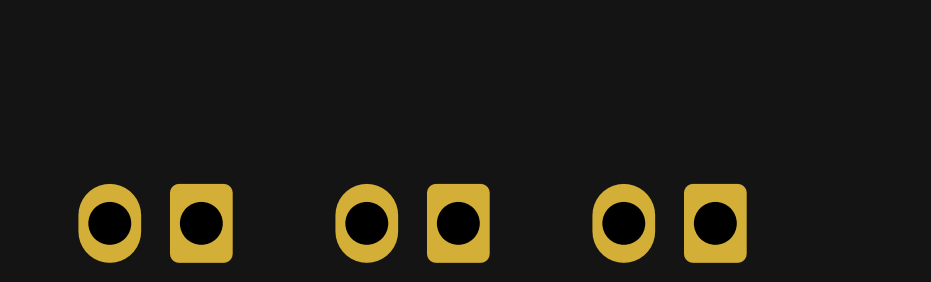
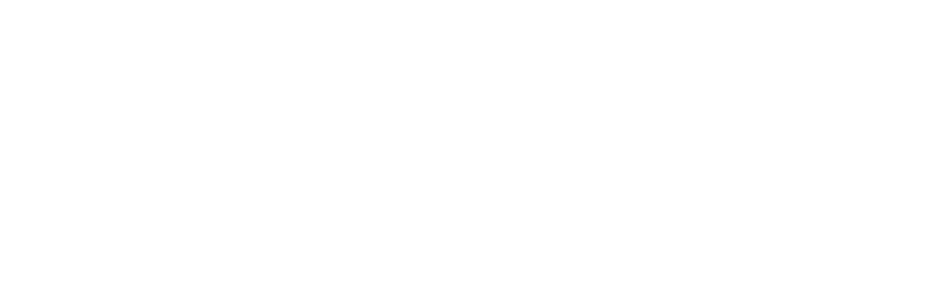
part: (155, 223) -> none
part: (412, 223) -> none
part: (669, 223) -> none

